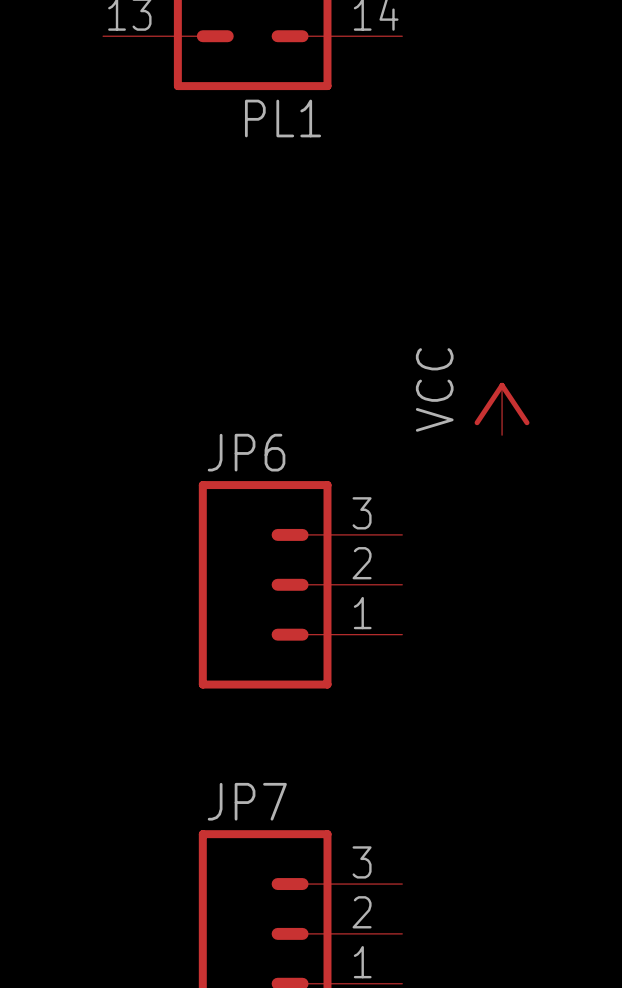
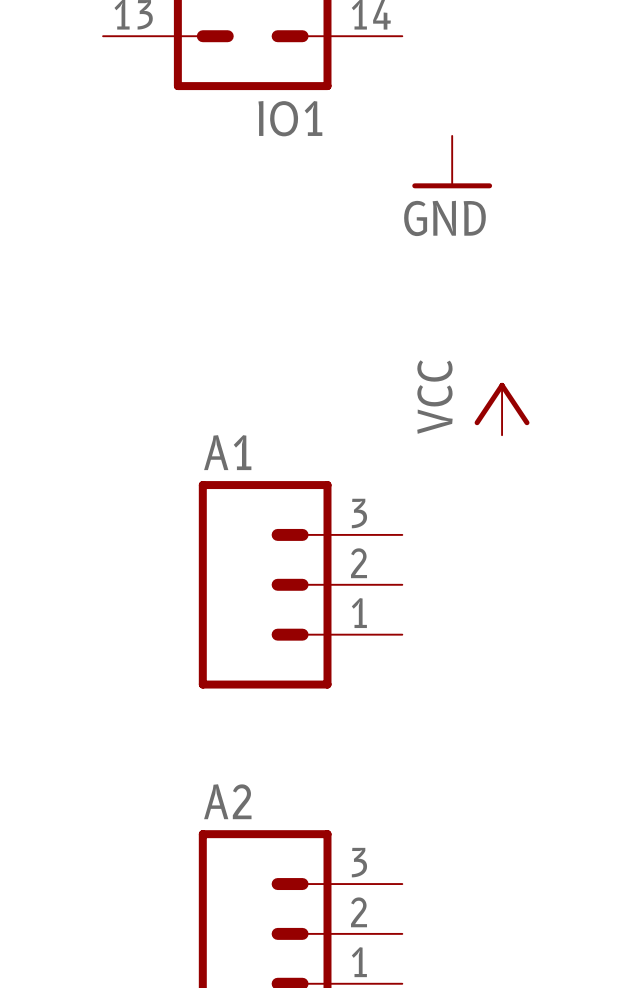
PL1 name: PL1 (283, 118) -> IO1 (290, 118)
power symbol: none -> GND (452, 162)
JP6 name: JP6 (246, 452) -> A1 (227, 452)
JP7 name: JP7 (247, 801) -> A2 (227, 801)

